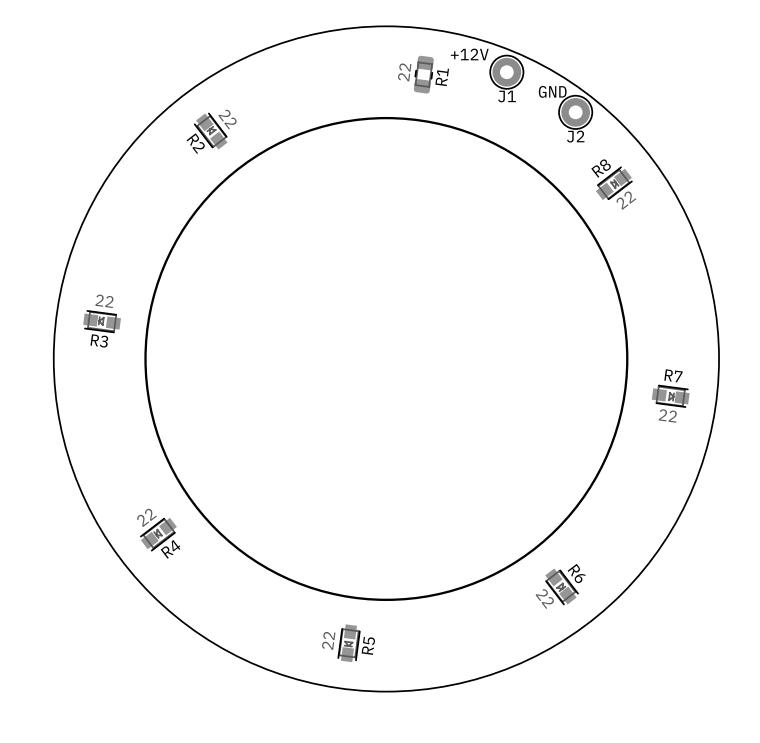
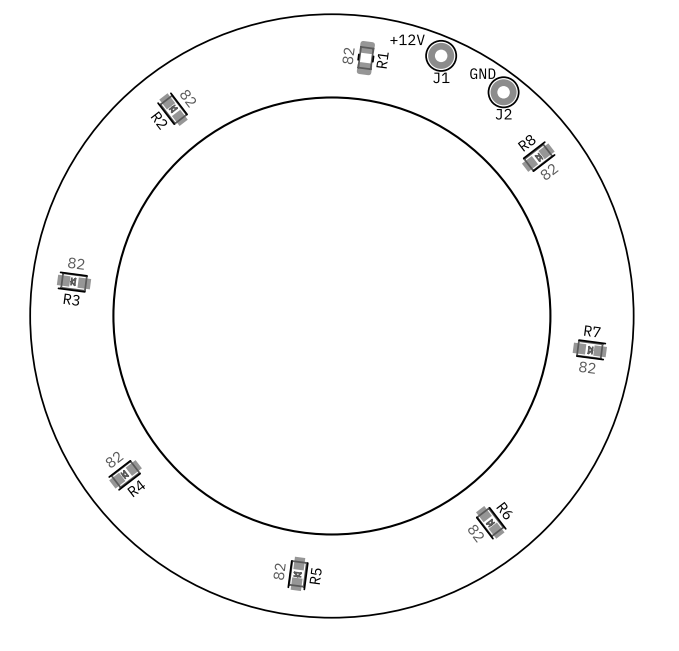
R1 value: 22 (404, 72) -> 82 (348, 56)
R2 value: 22 (227, 119) -> 82 (188, 98)
R8 value: 22 (626, 200) -> 82 (549, 171)
R3 value: 22 (104, 301) -> 82 (76, 263)
R7 value: 22 (667, 415) -> 82 (587, 367)
R4 value: 22 (147, 517) -> 82 (114, 459)
R6 value: 22 (544, 599) -> 82 (476, 533)
R5 value: 22 (328, 640) -> 82 (279, 571)

